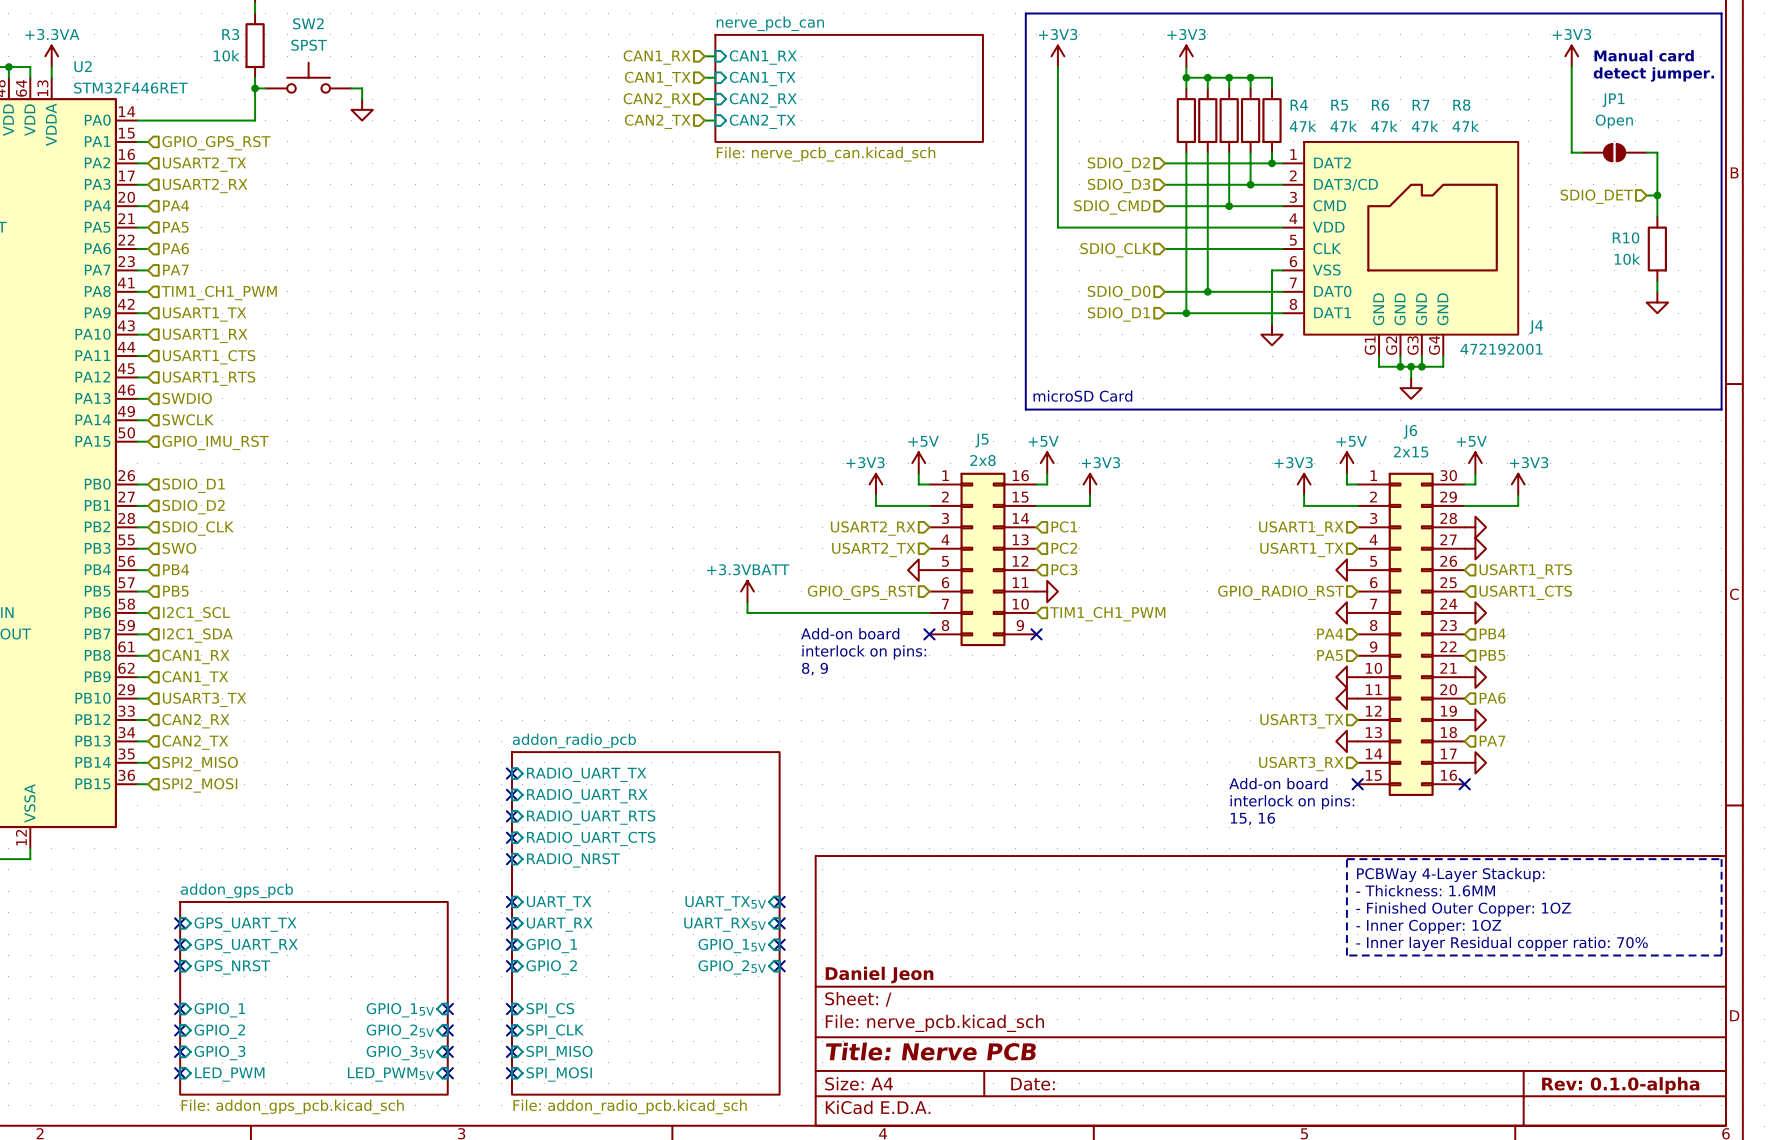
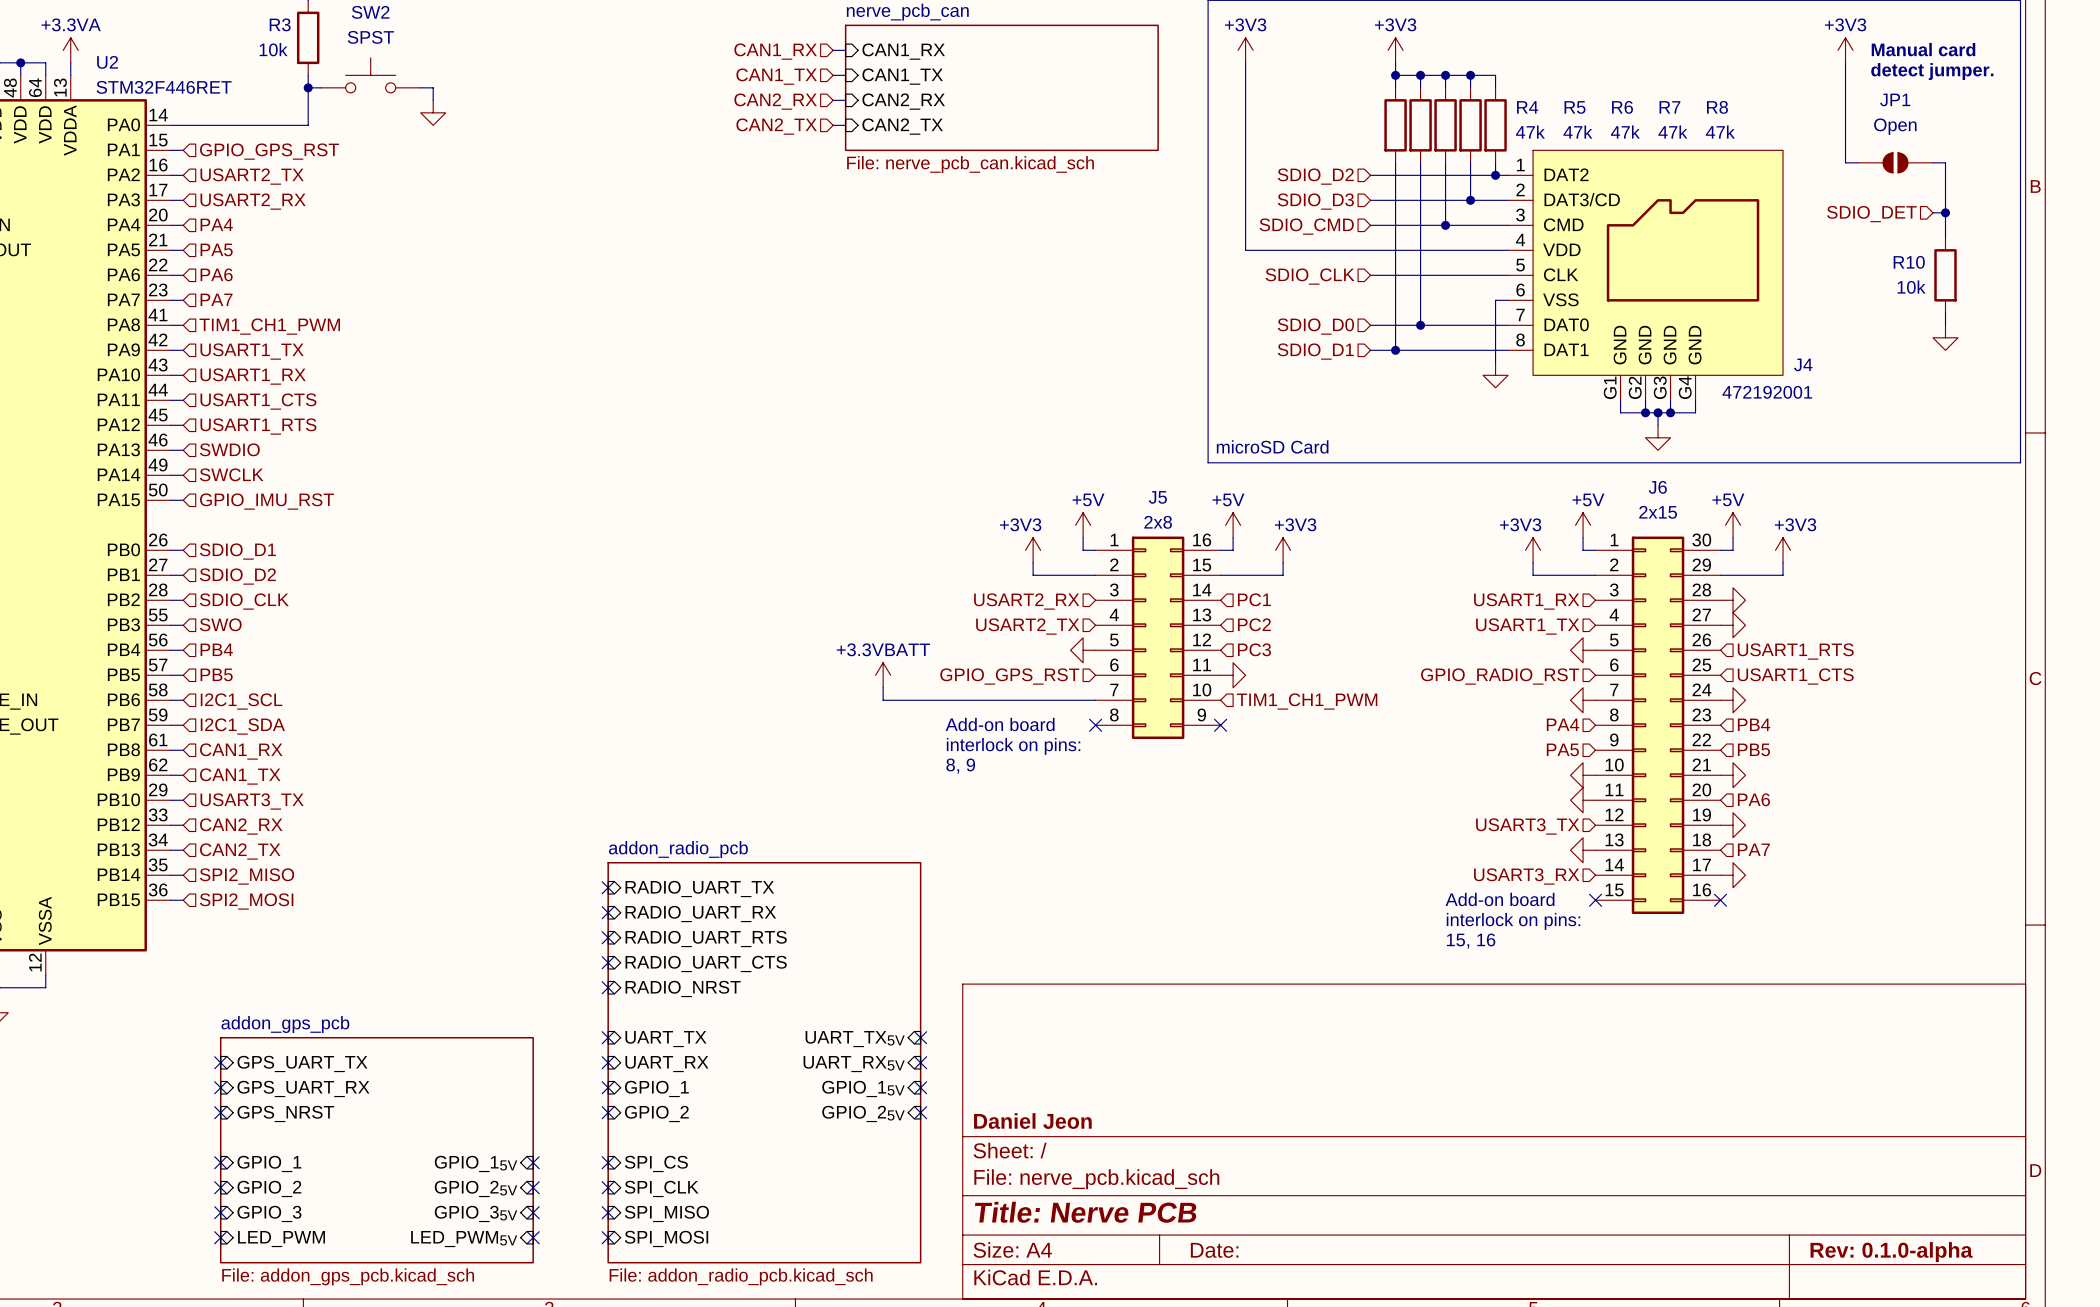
line: (1346, 859) (1721, 859) (1721, 955) (1346, 955) (1346, 859) -> none
text: PCBWay 4-Layer Stackup: (1450, 874) -> none
text: - Thickness: 1.6MM (1425, 890) -> none
text: - Finished Outer Copper: 1OZ (1463, 909) -> none
text: - Inner Copper: 1OZ (1428, 926) -> none
text: - Inner layer Residual copper ratio: 70% (1502, 943) -> none

